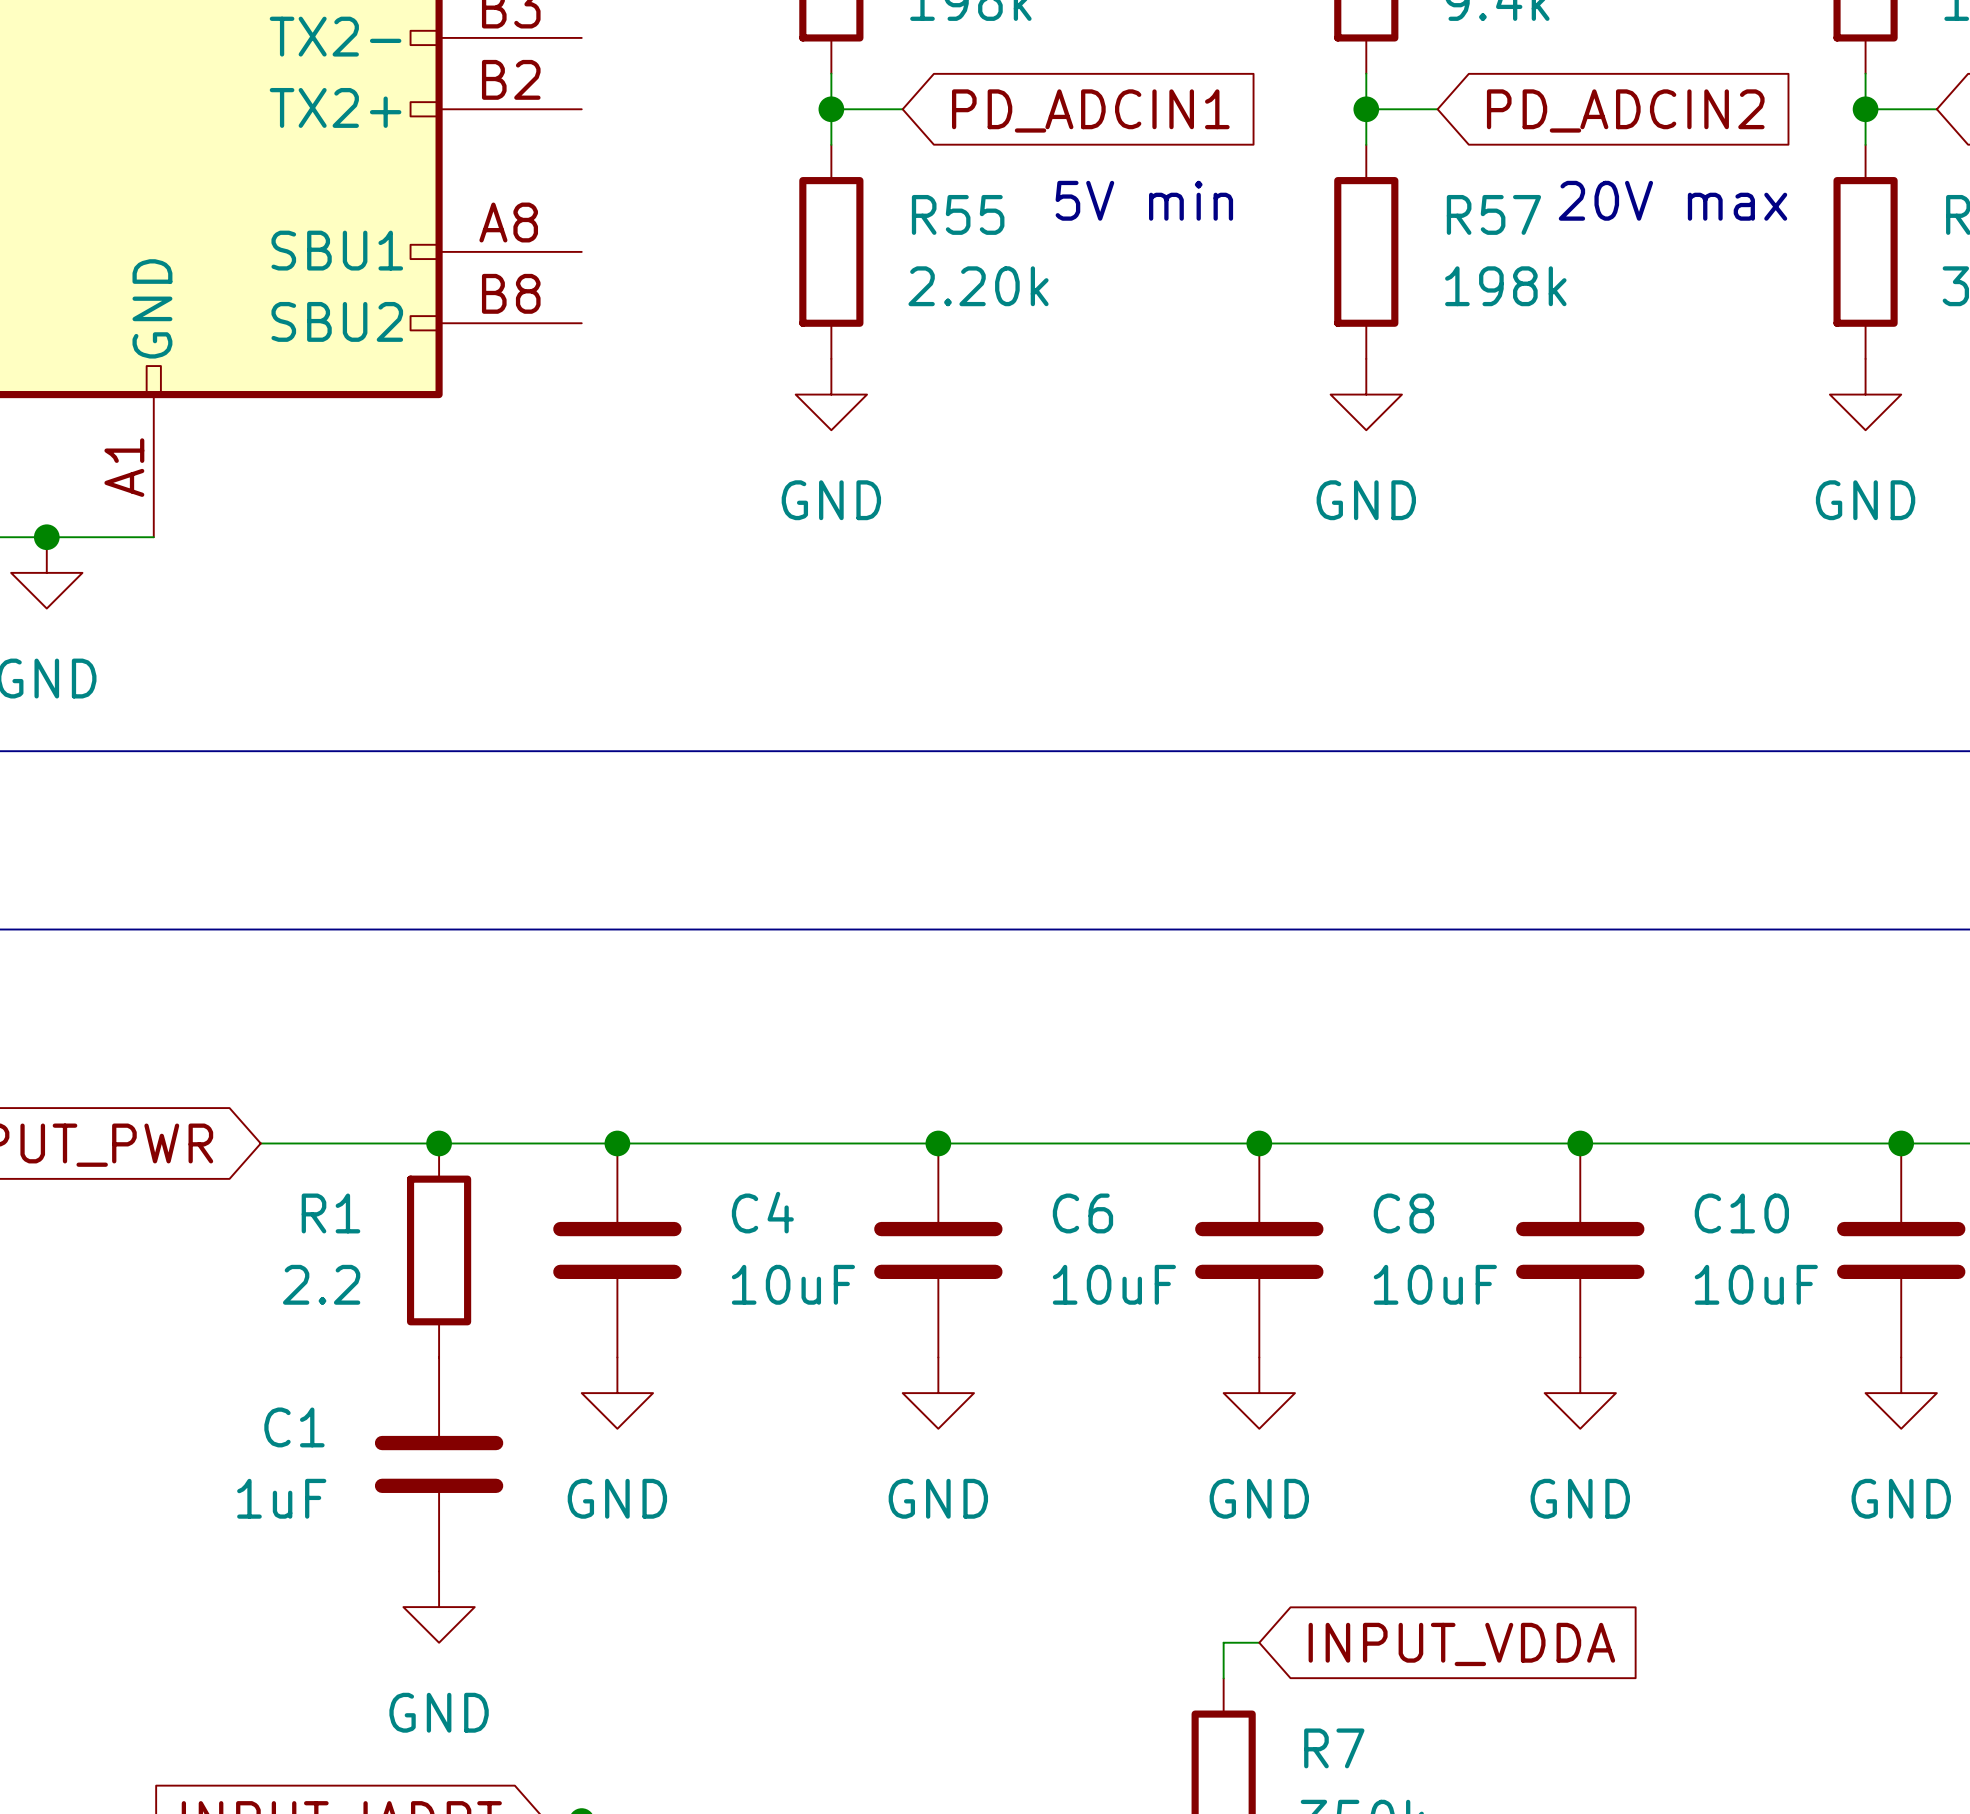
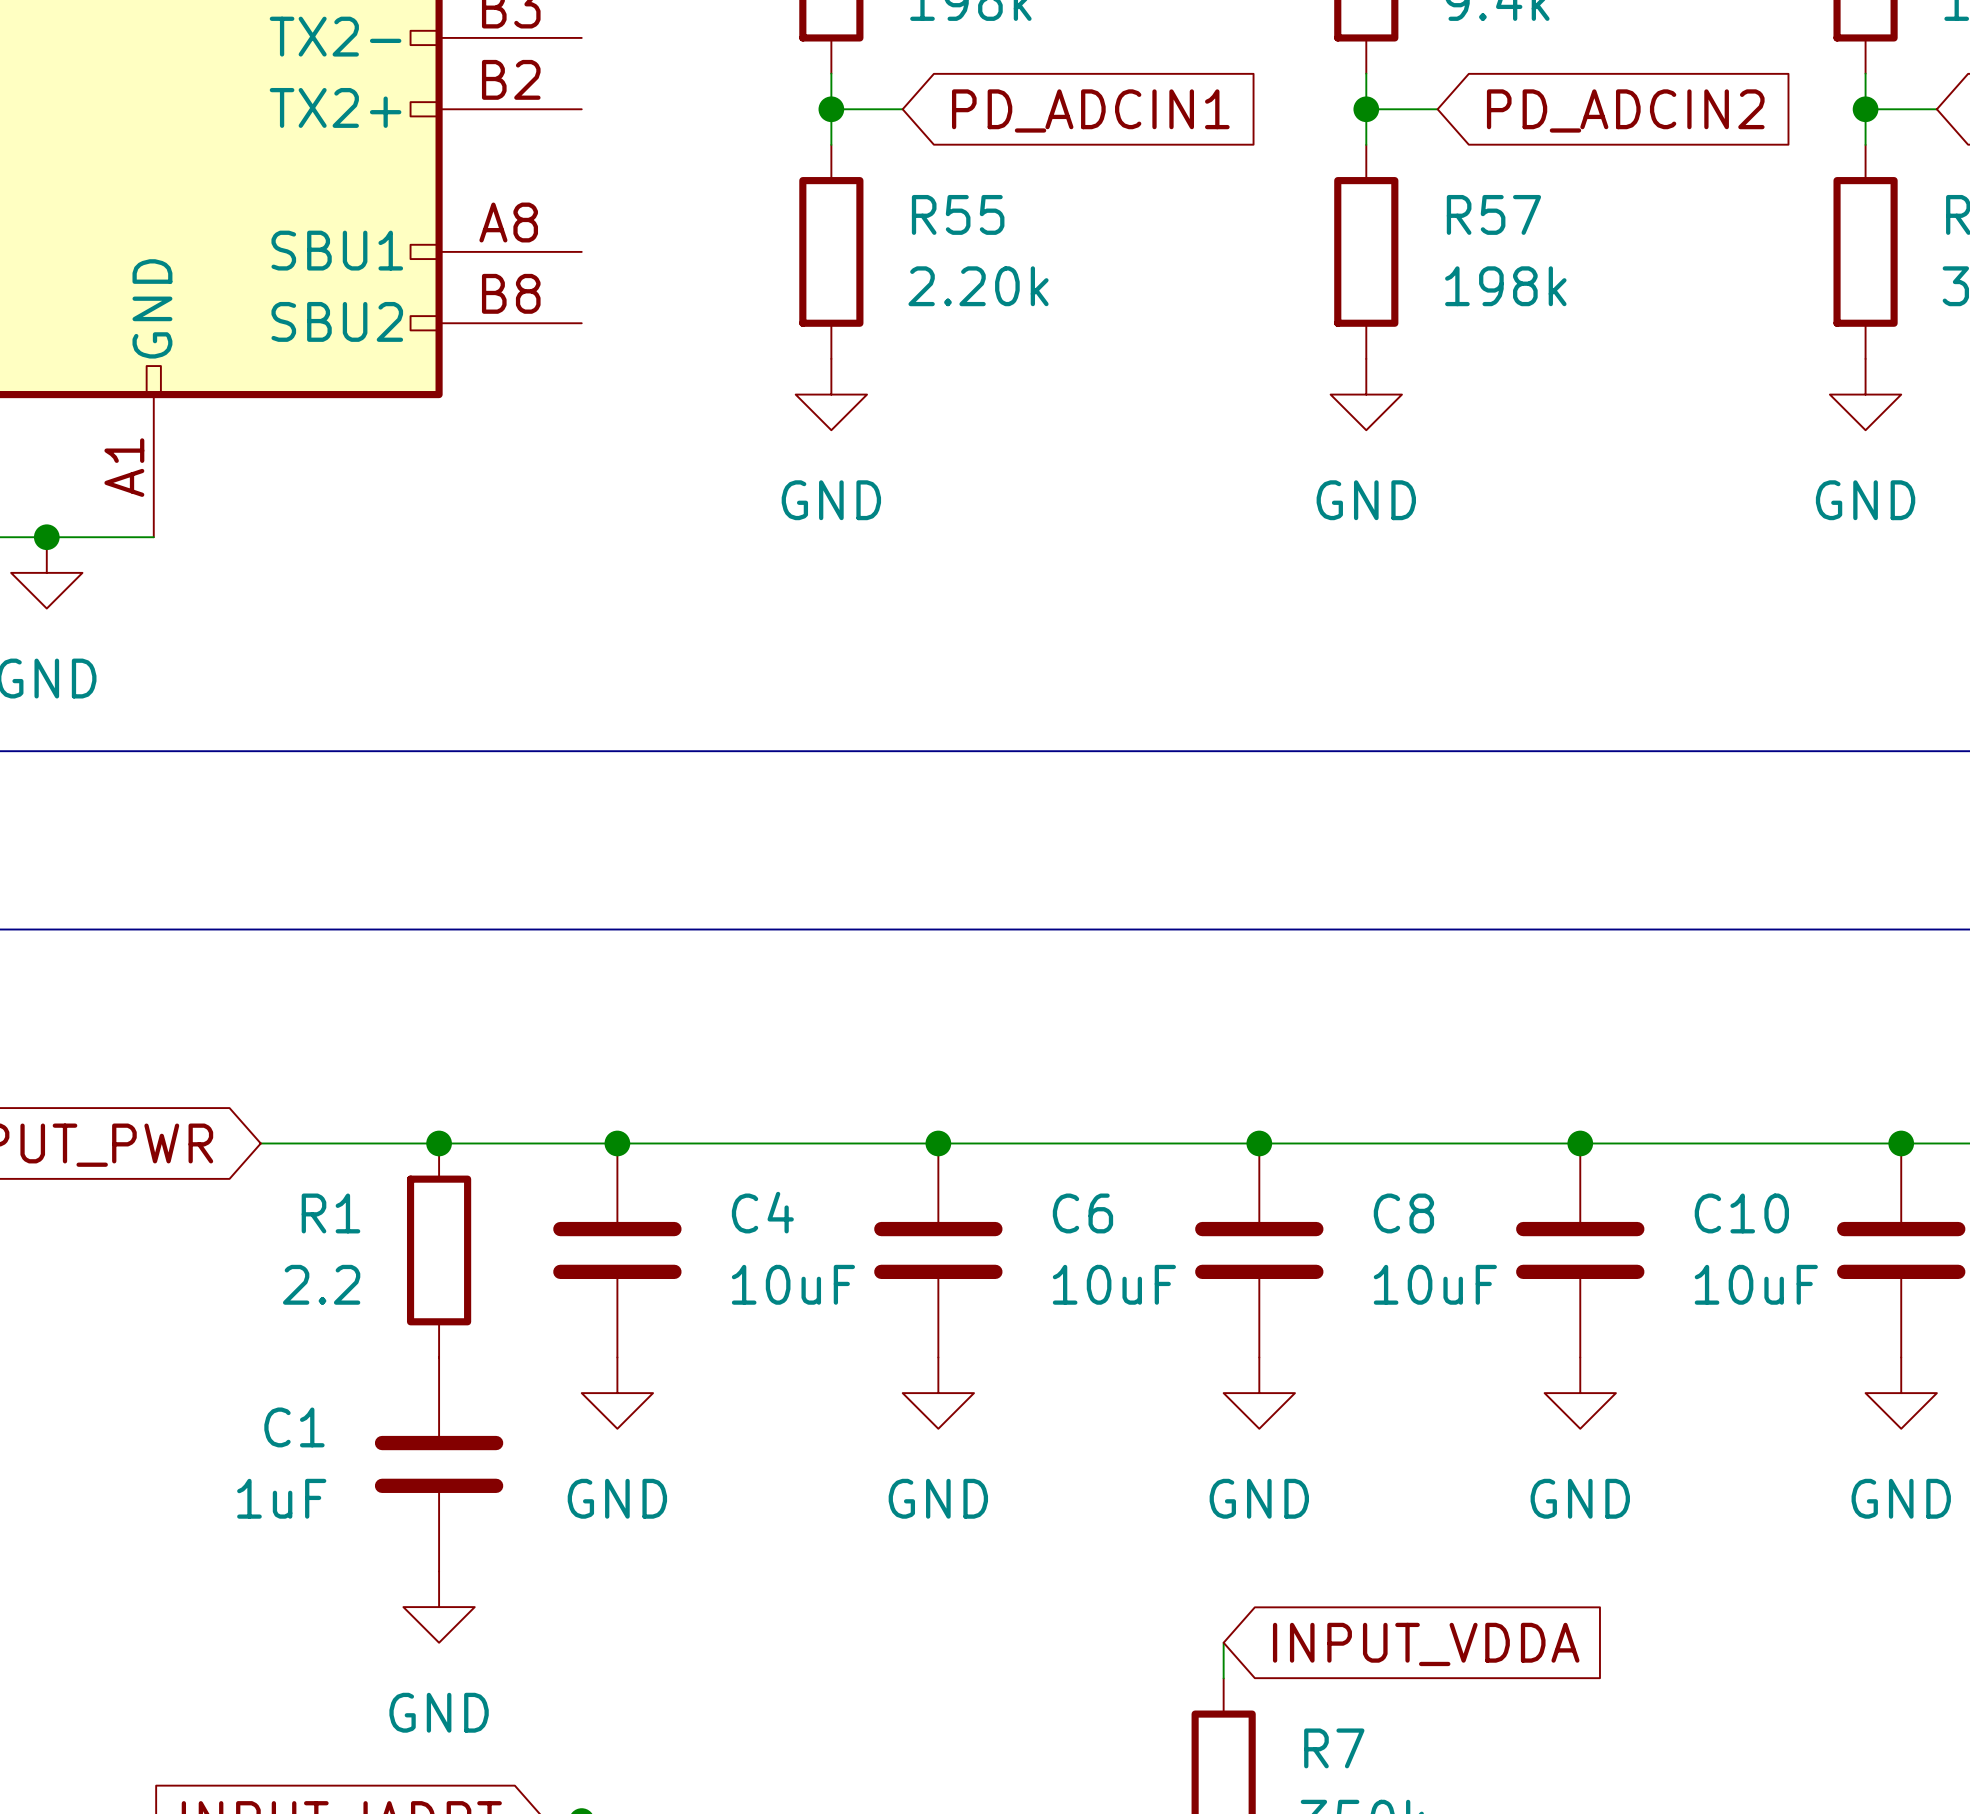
text: 5V min (1144, 200) -> none
text: 20V max (1672, 200) -> none
wire: (1223, 1642) (1259, 1642) -> none
global label position: INPUT_VDDA (1461, 1644) -> INPUT_VDDA (1426, 1644)

